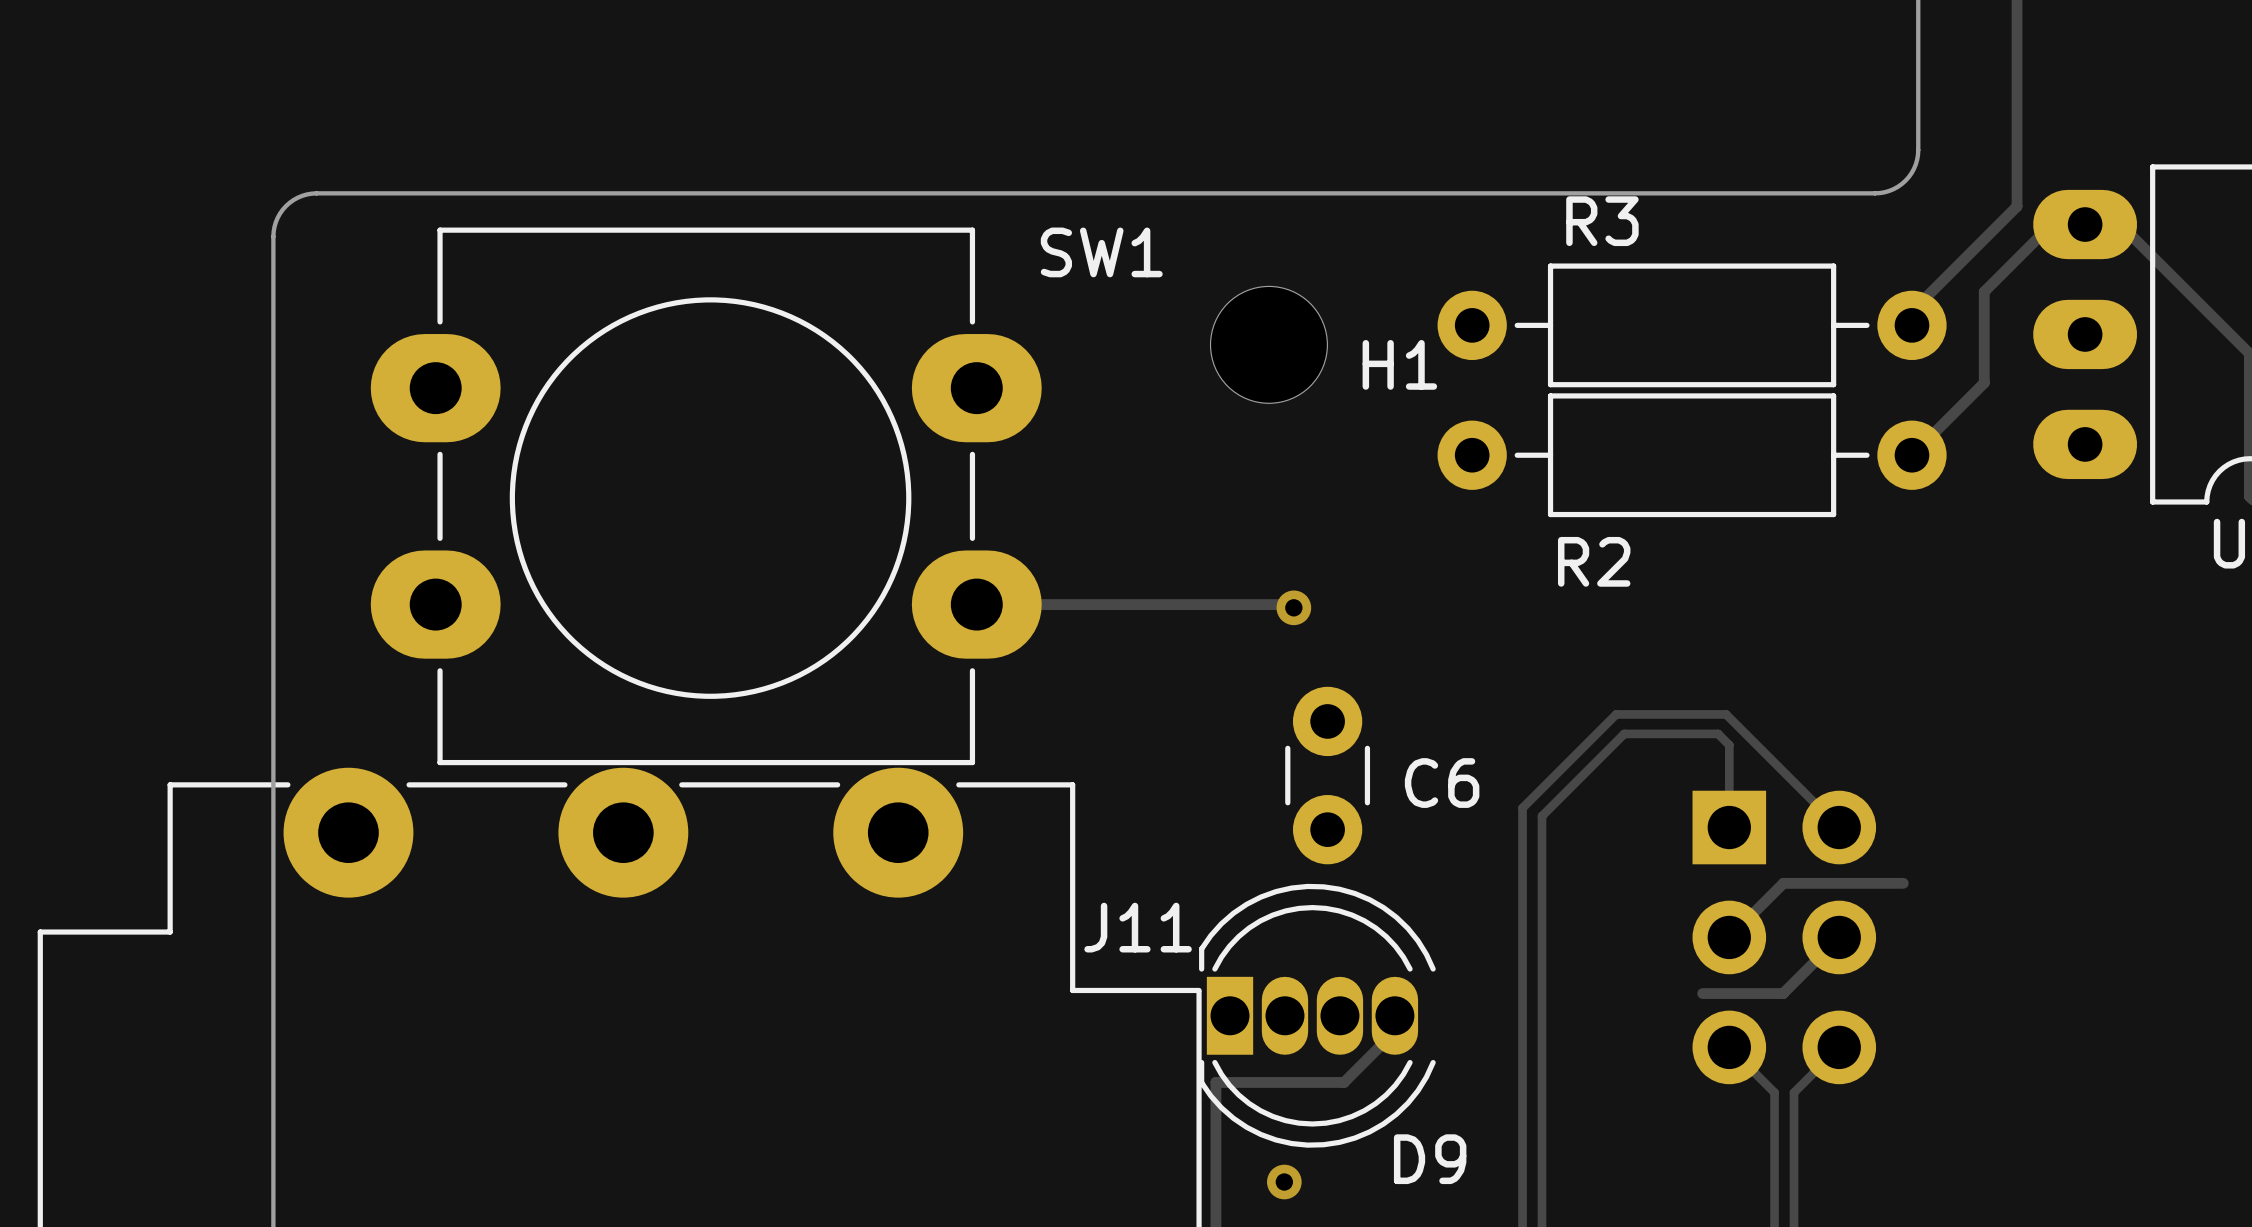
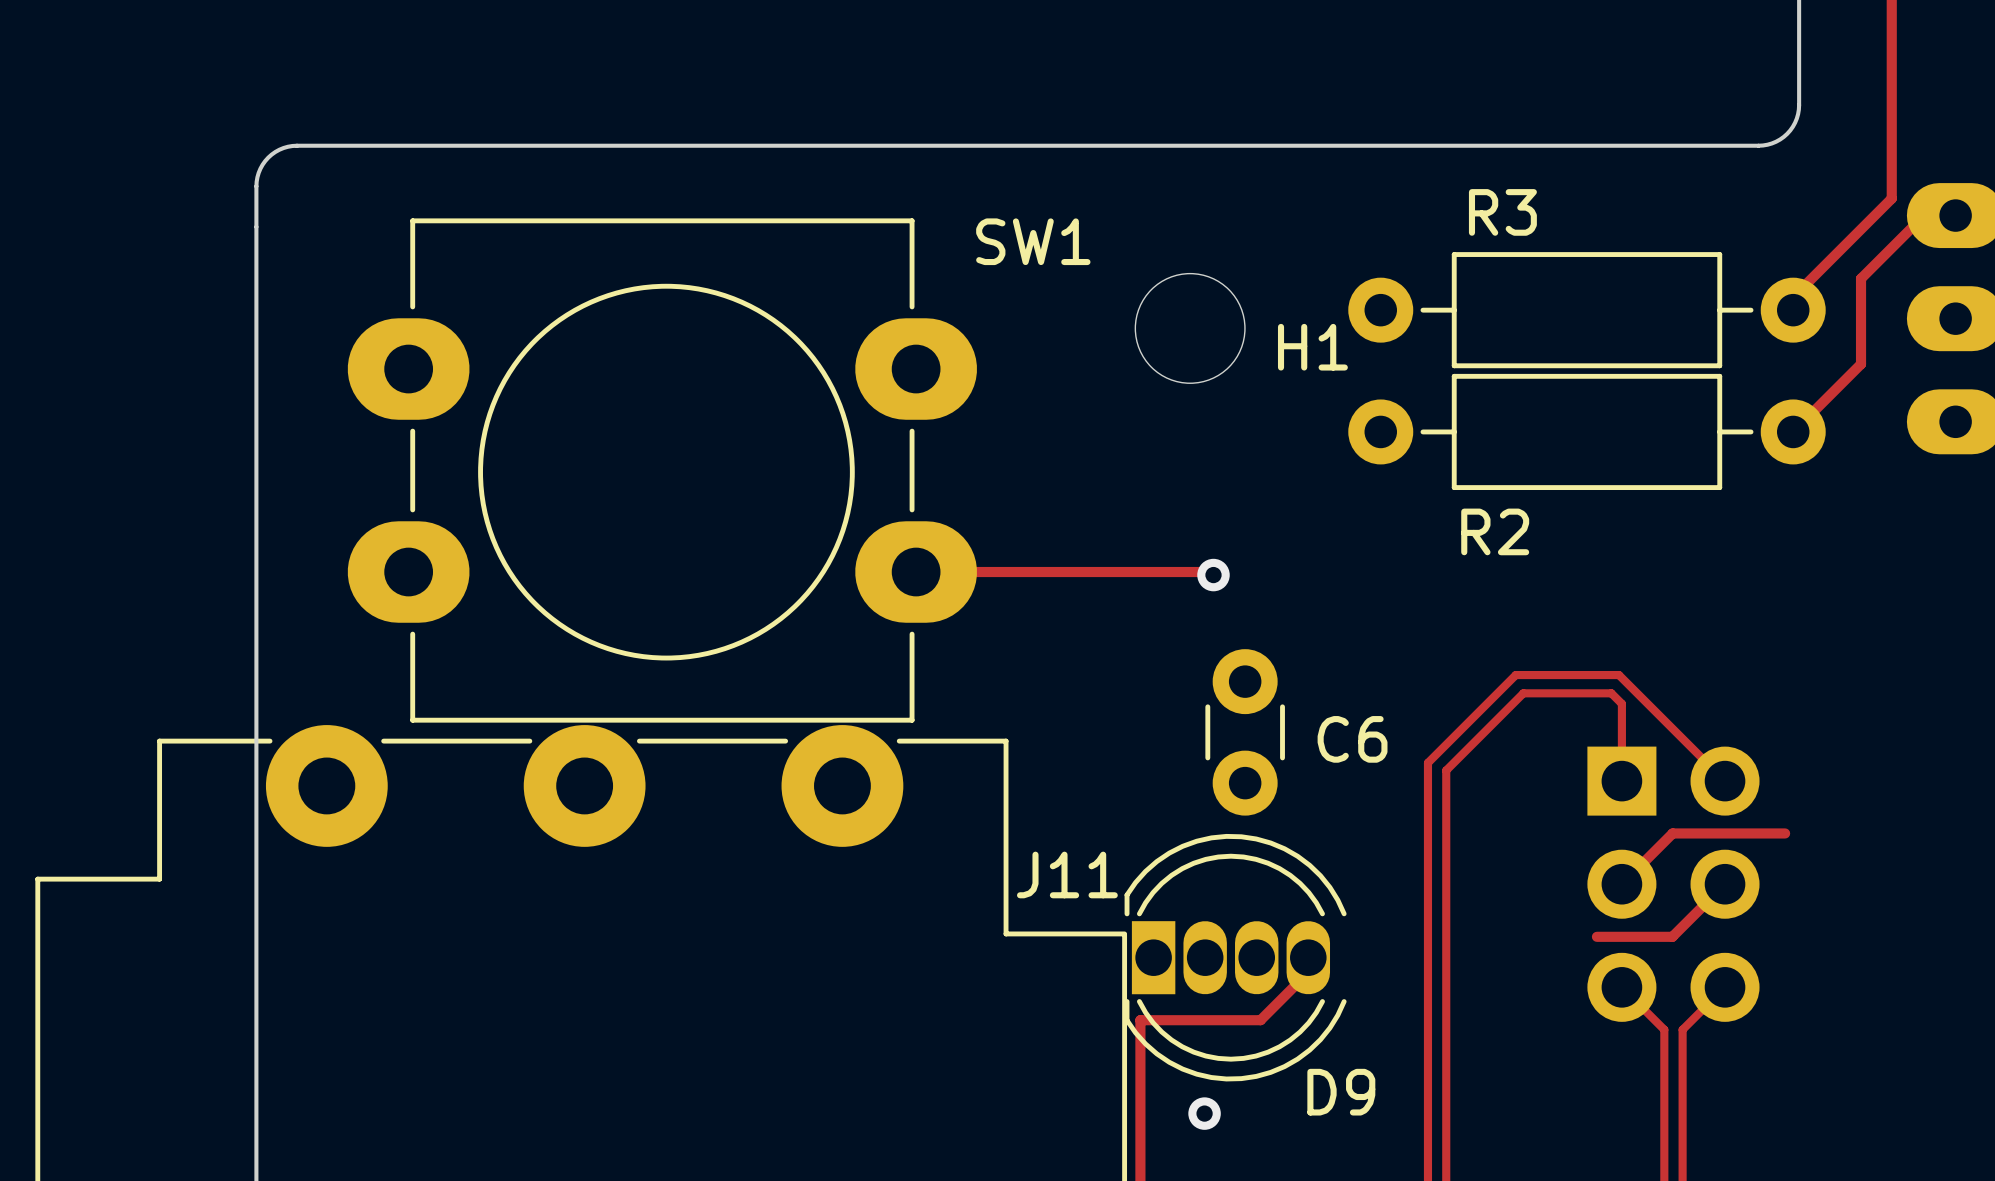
board edge: (1918, 106) (1917, 154) (1913, 168) (1908, 177) (1898, 186) (1879, 193) (316, 193) (302, 195) (286, 206) (277, 217) (273, 236) -> (1799, 105) (1796, 118) (1787, 133) (1771, 143) (1758, 145) (292, 145) (283, 148) (271, 154) (260, 168) (256, 181) (256, 226)

